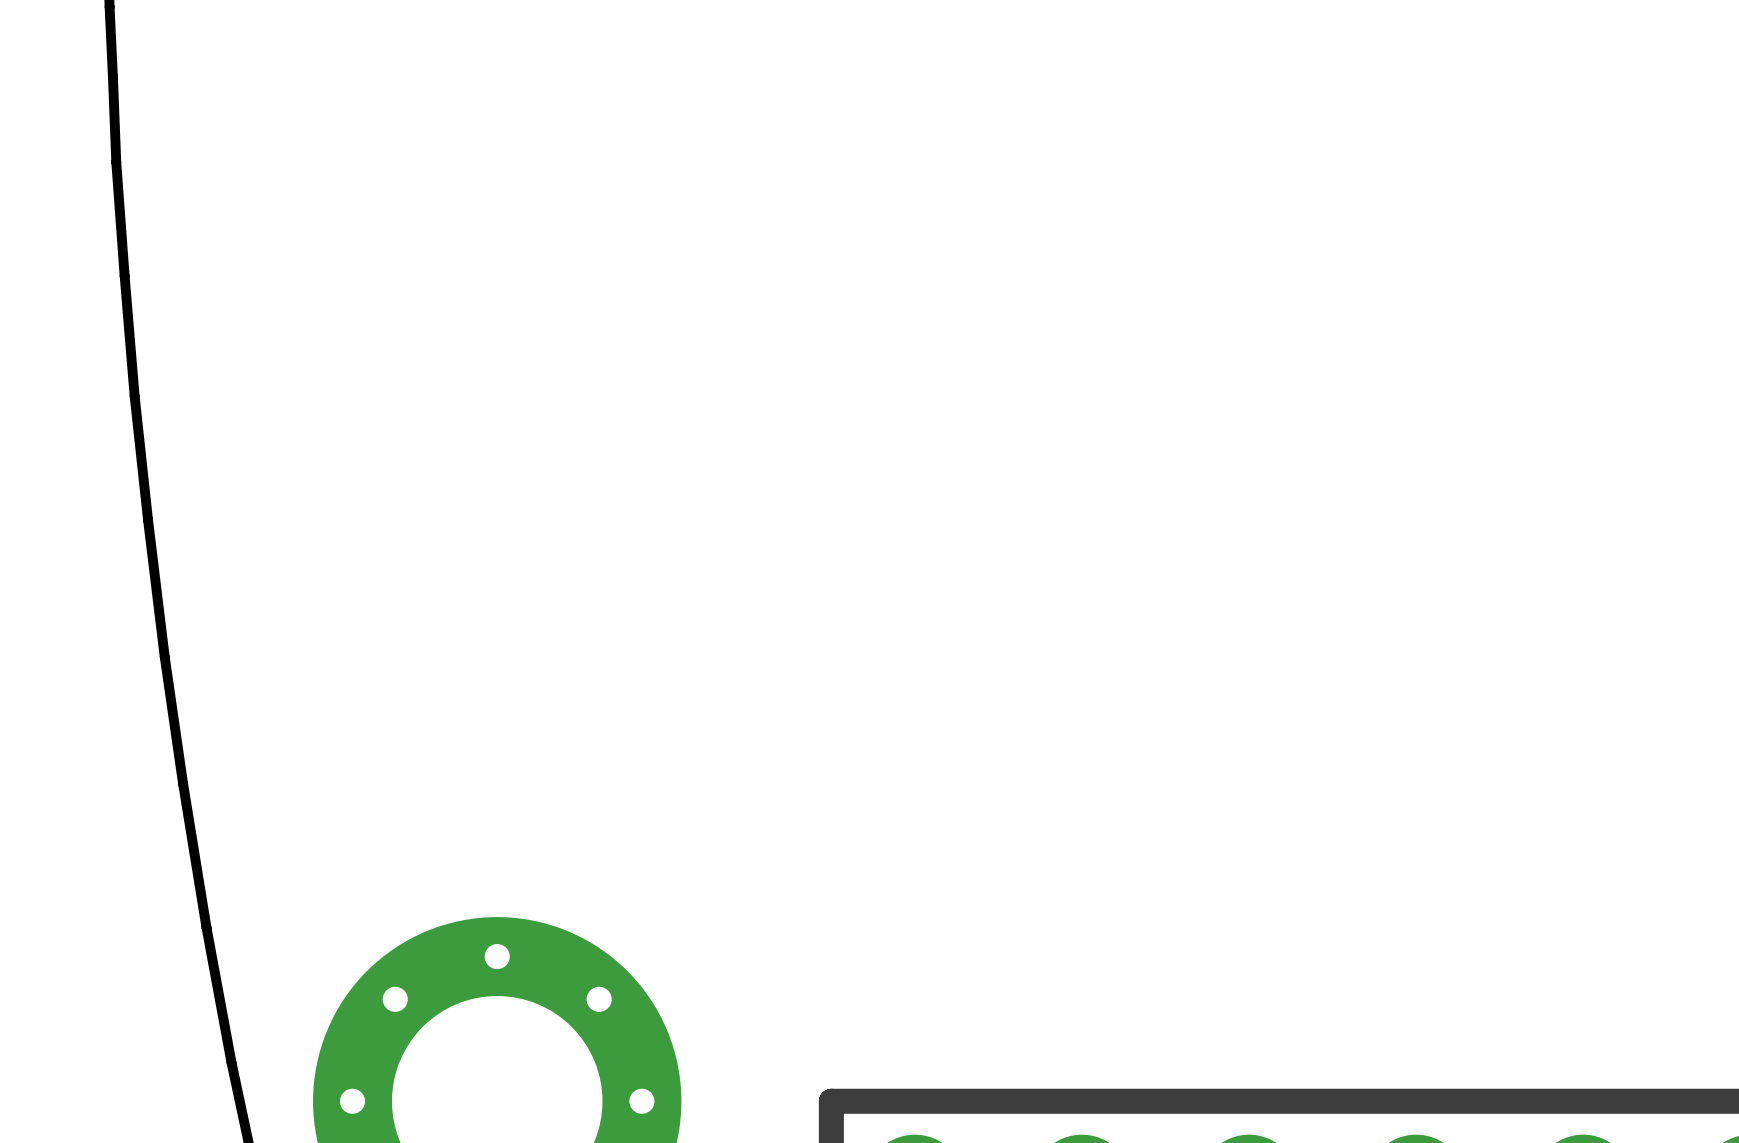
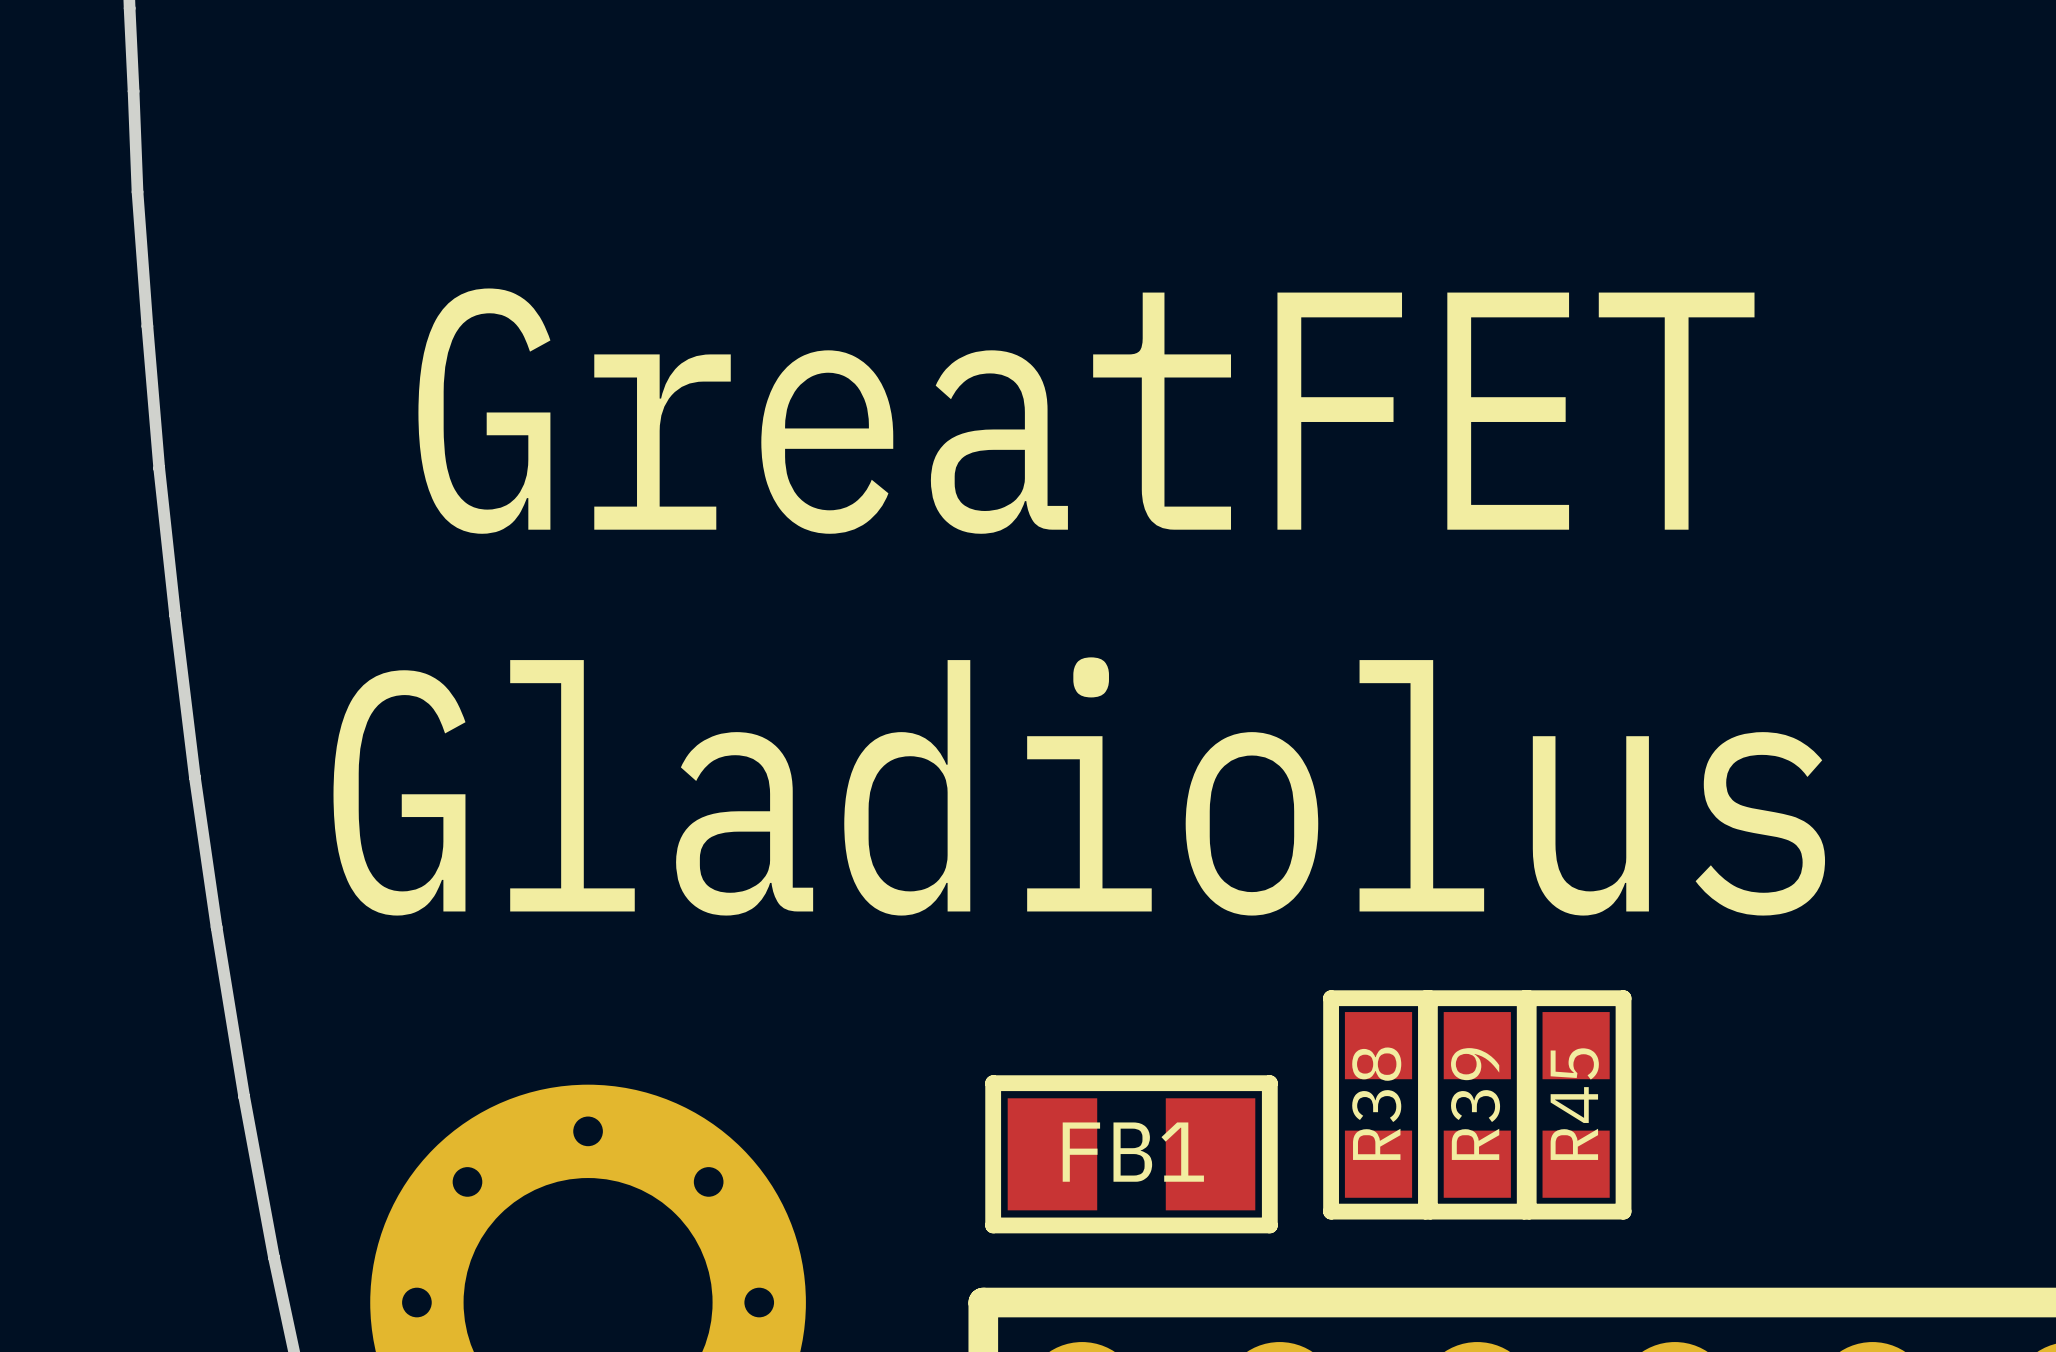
text: none -> GreatFET (1086, 411)
text: none -> Gladiolus (1079, 786)
R38: none -> (1378, 1104)
R39: none -> (1477, 1104)
R45: none -> (1576, 1104)
FB1: none -> (1131, 1154)

